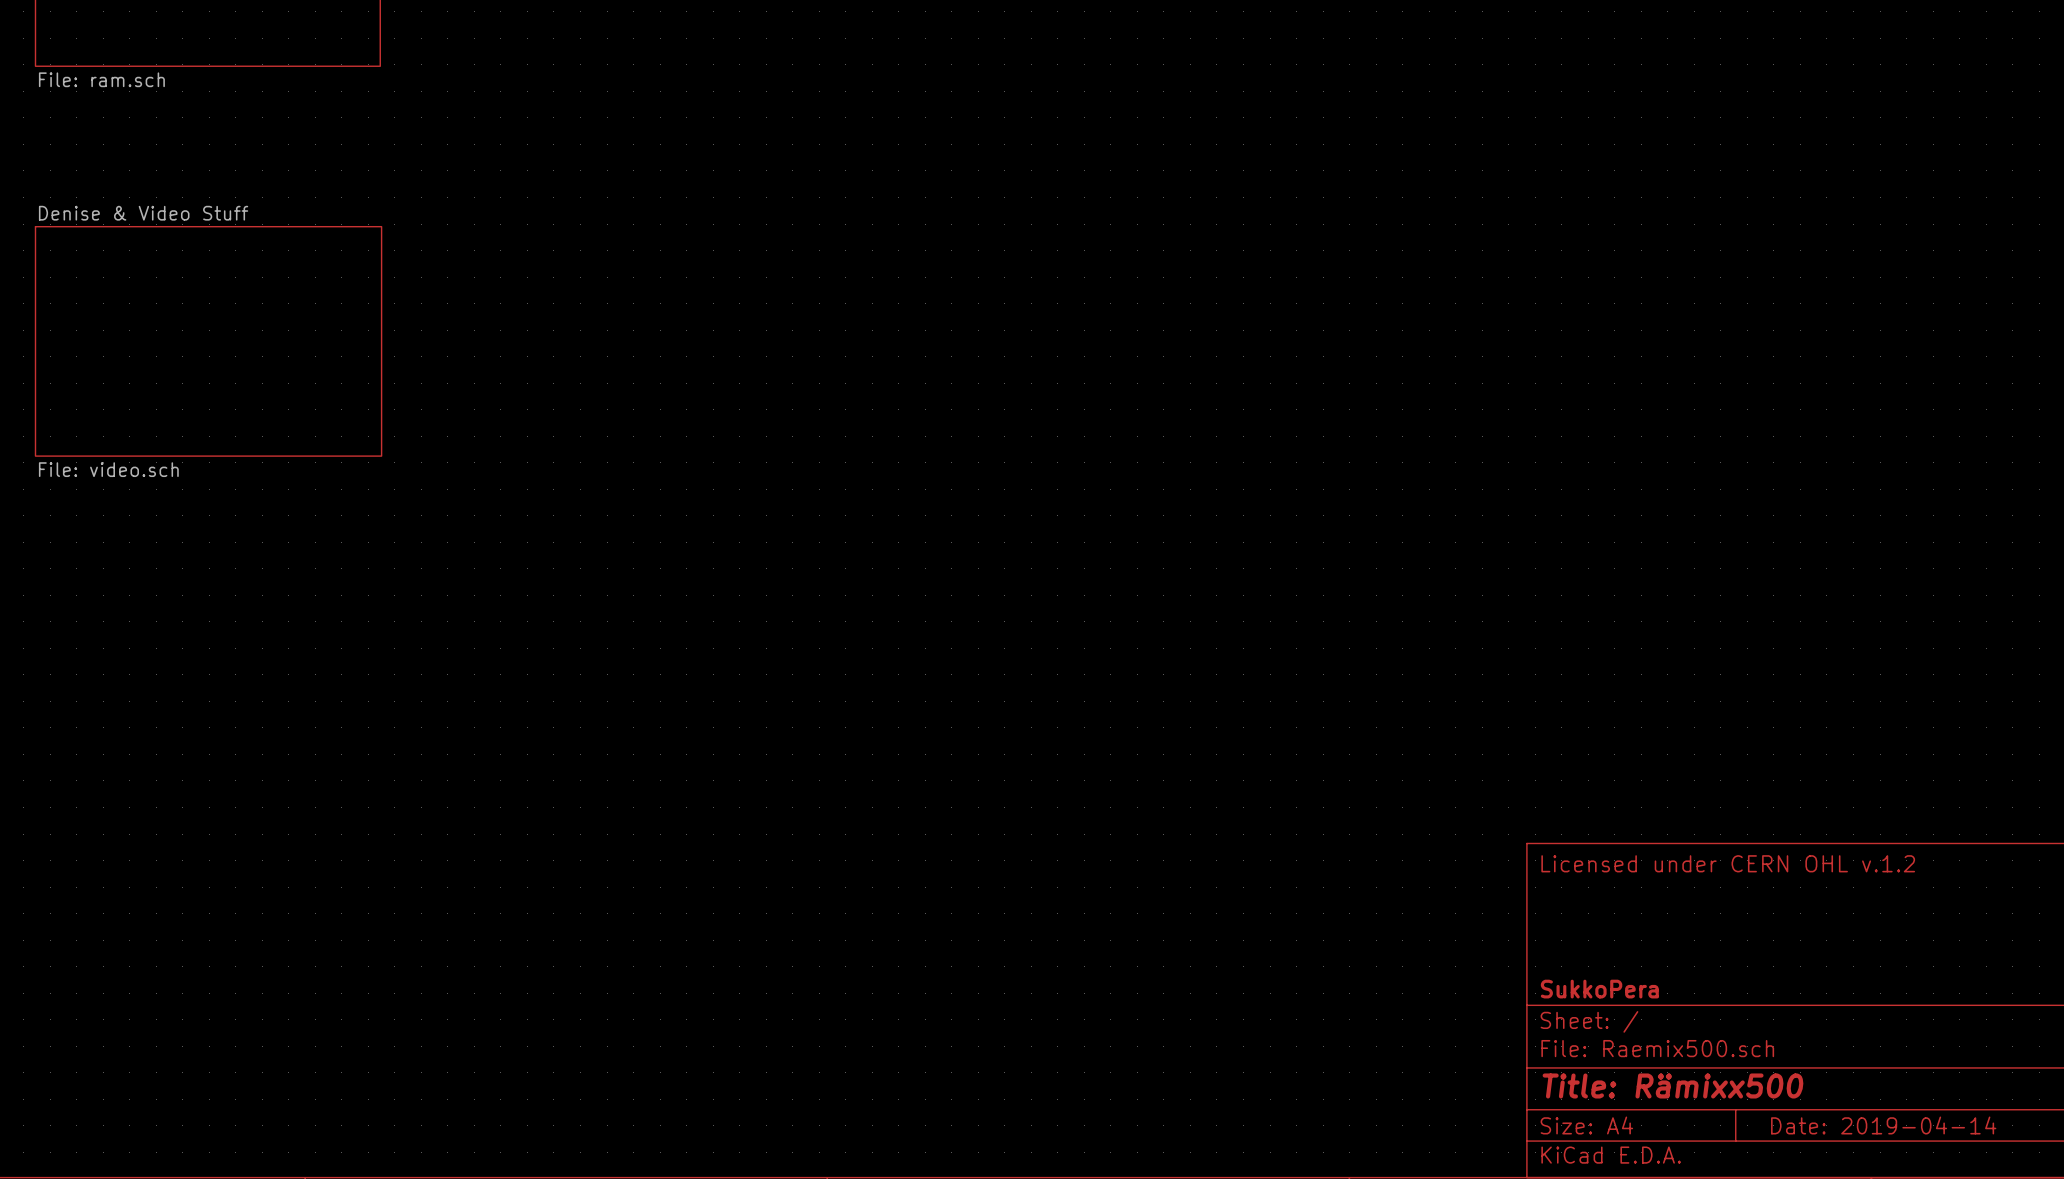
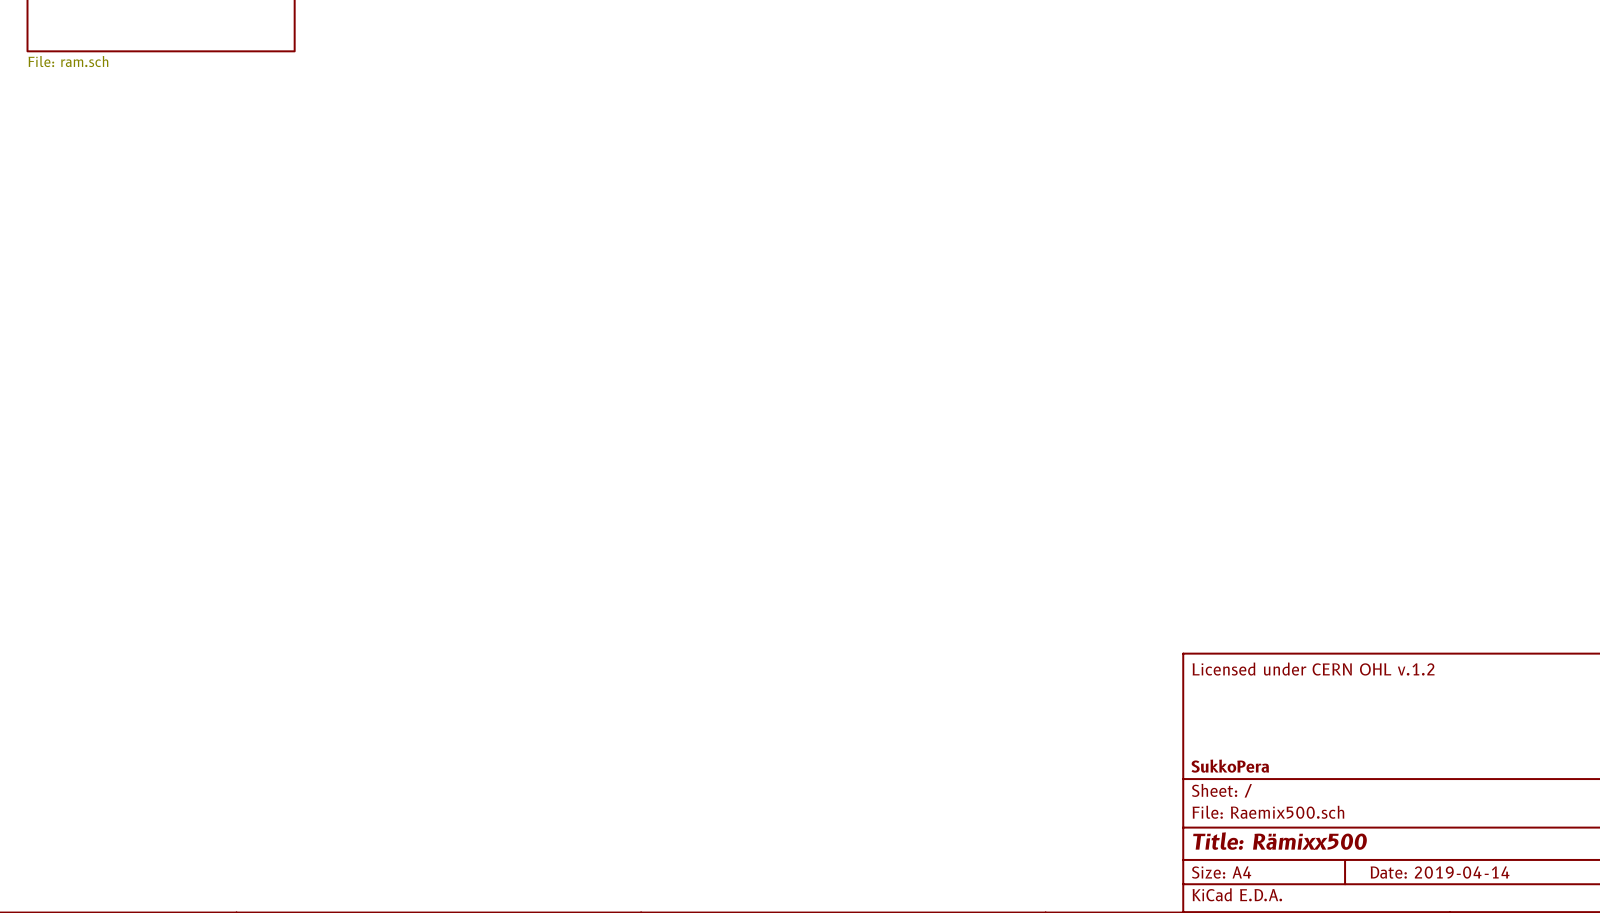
sheet Denise & Video Stuff: File: video.sch (208, 341) -> none

